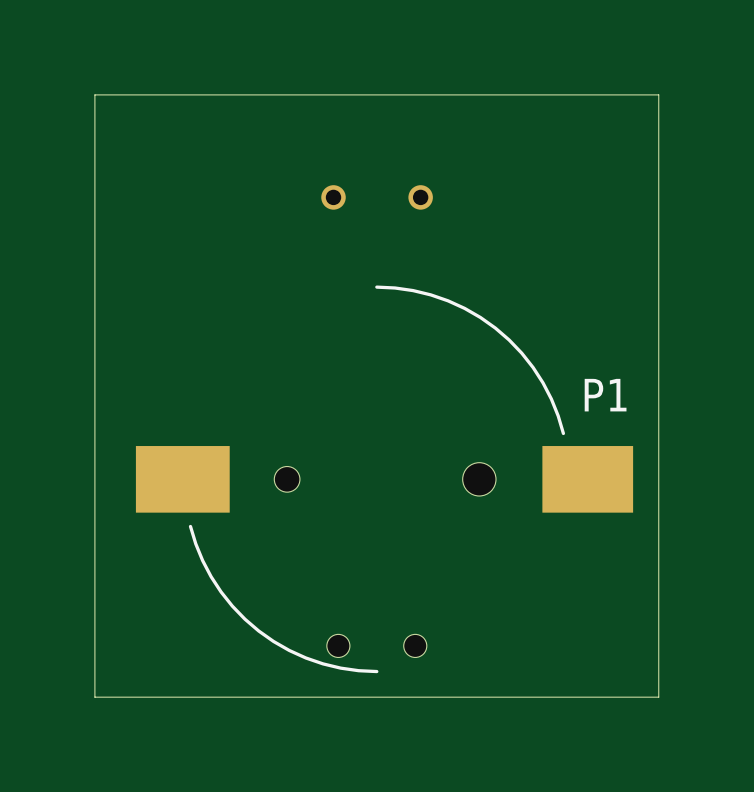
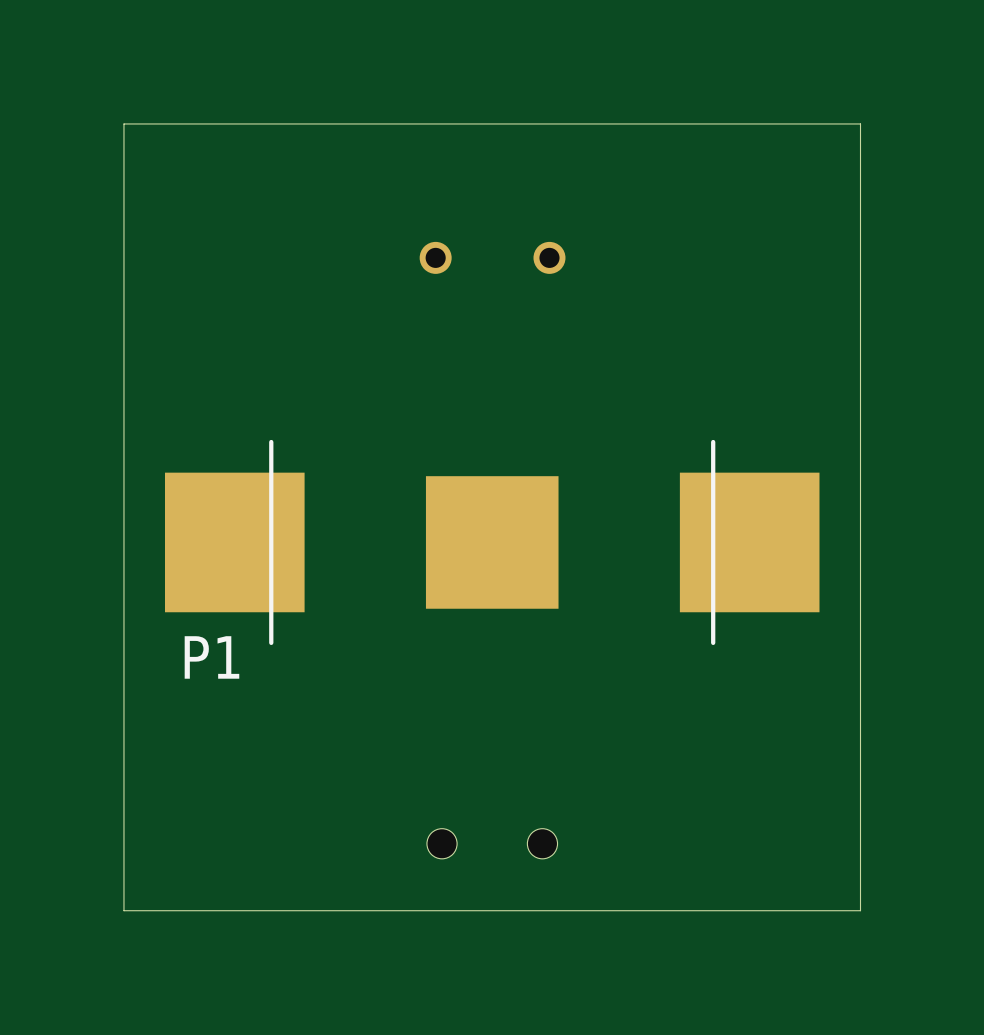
P1 footprint: [135, 285, 634, 674] -> [164, 439, 820, 646]
P1 name position: P1 (605, 395) -> P1 (211, 657)

